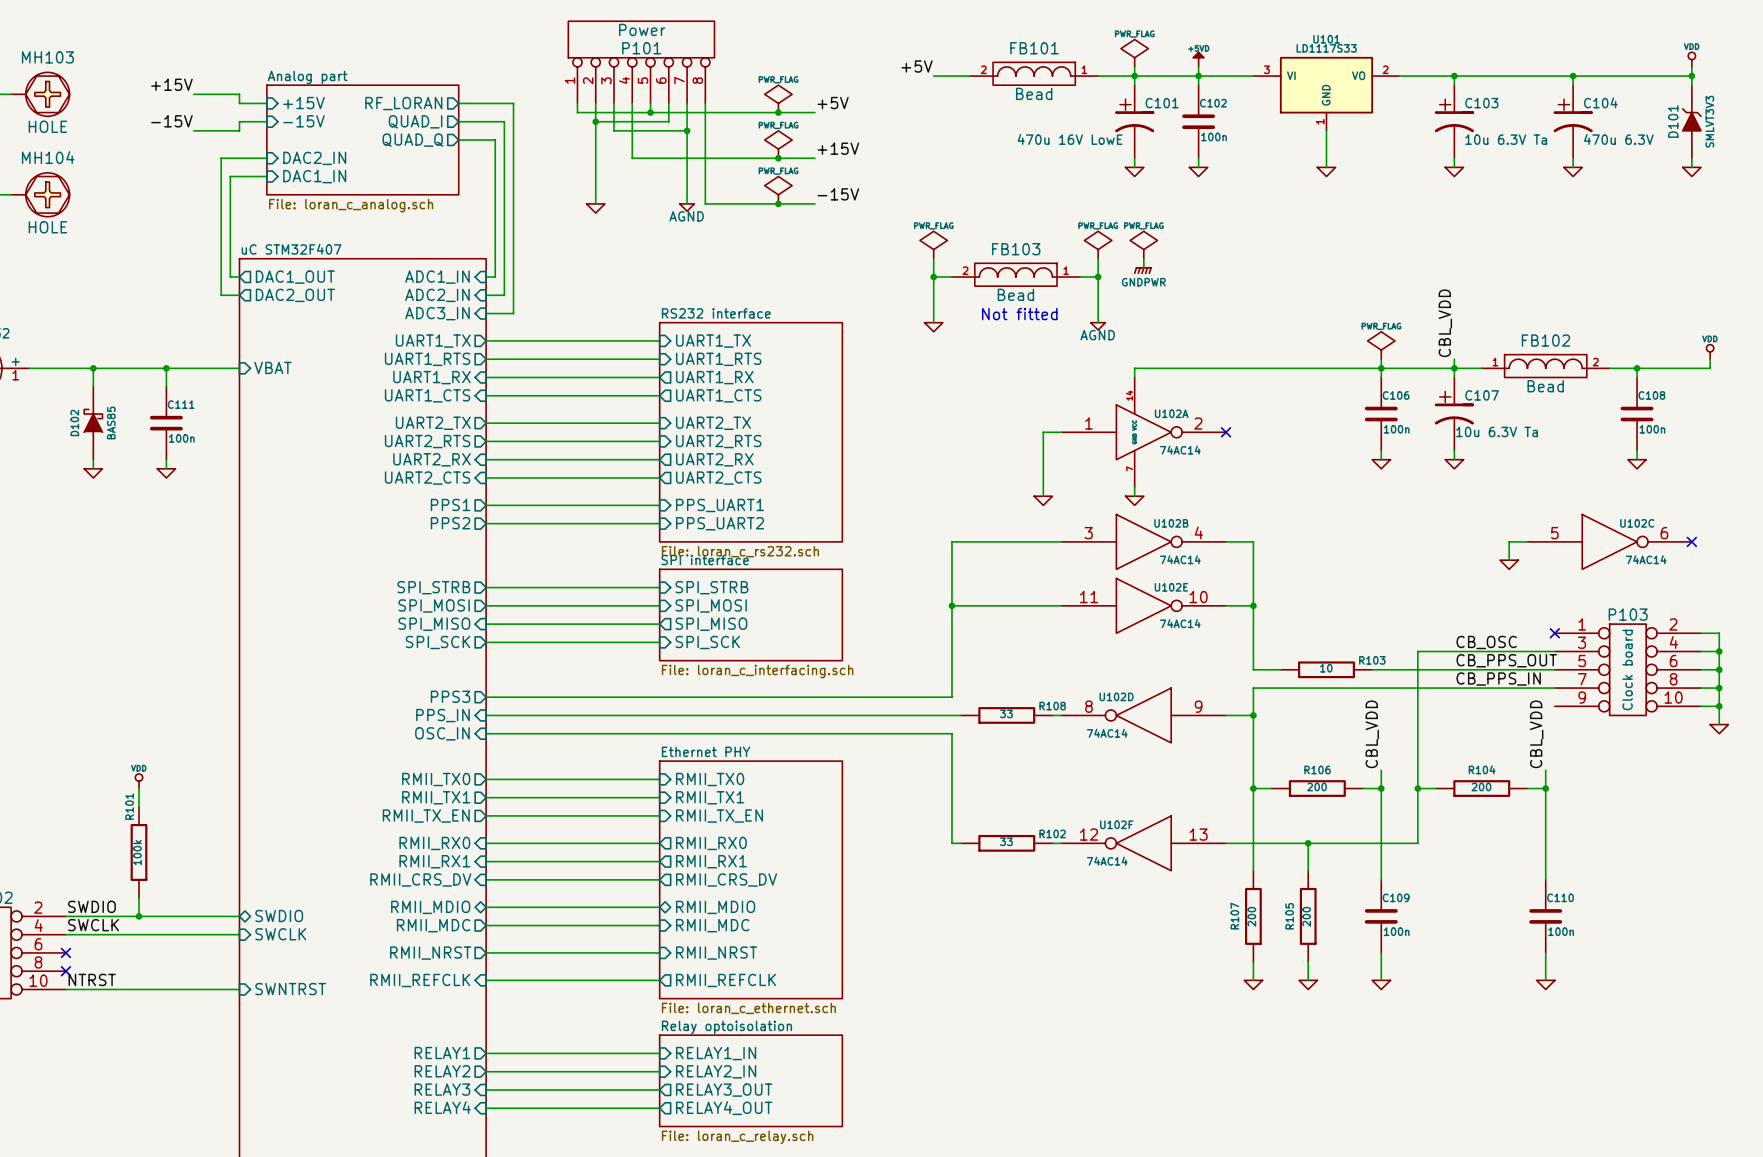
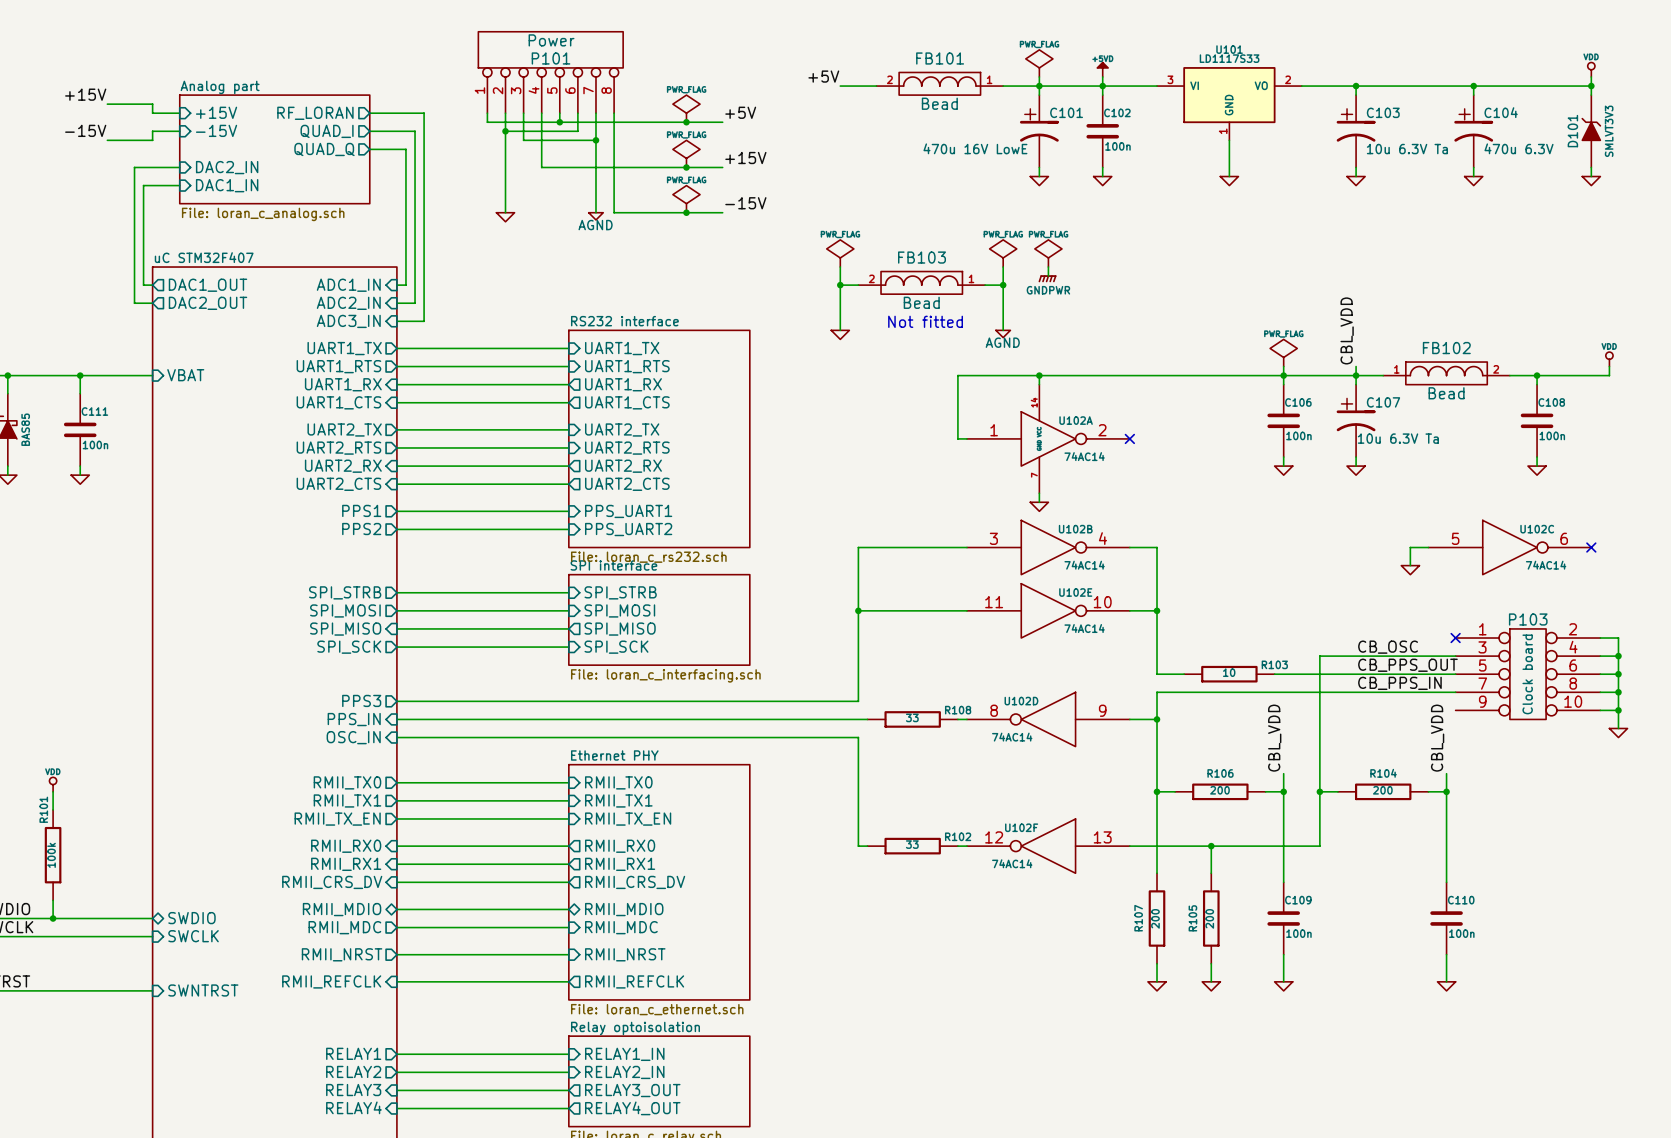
junction: none -> (1039, 375)
wire: (1052, 432) (1043, 432) (1043, 496) -> (957, 438) (957, 375) (1039, 375)
power symbol: (1043, 500) -> none

